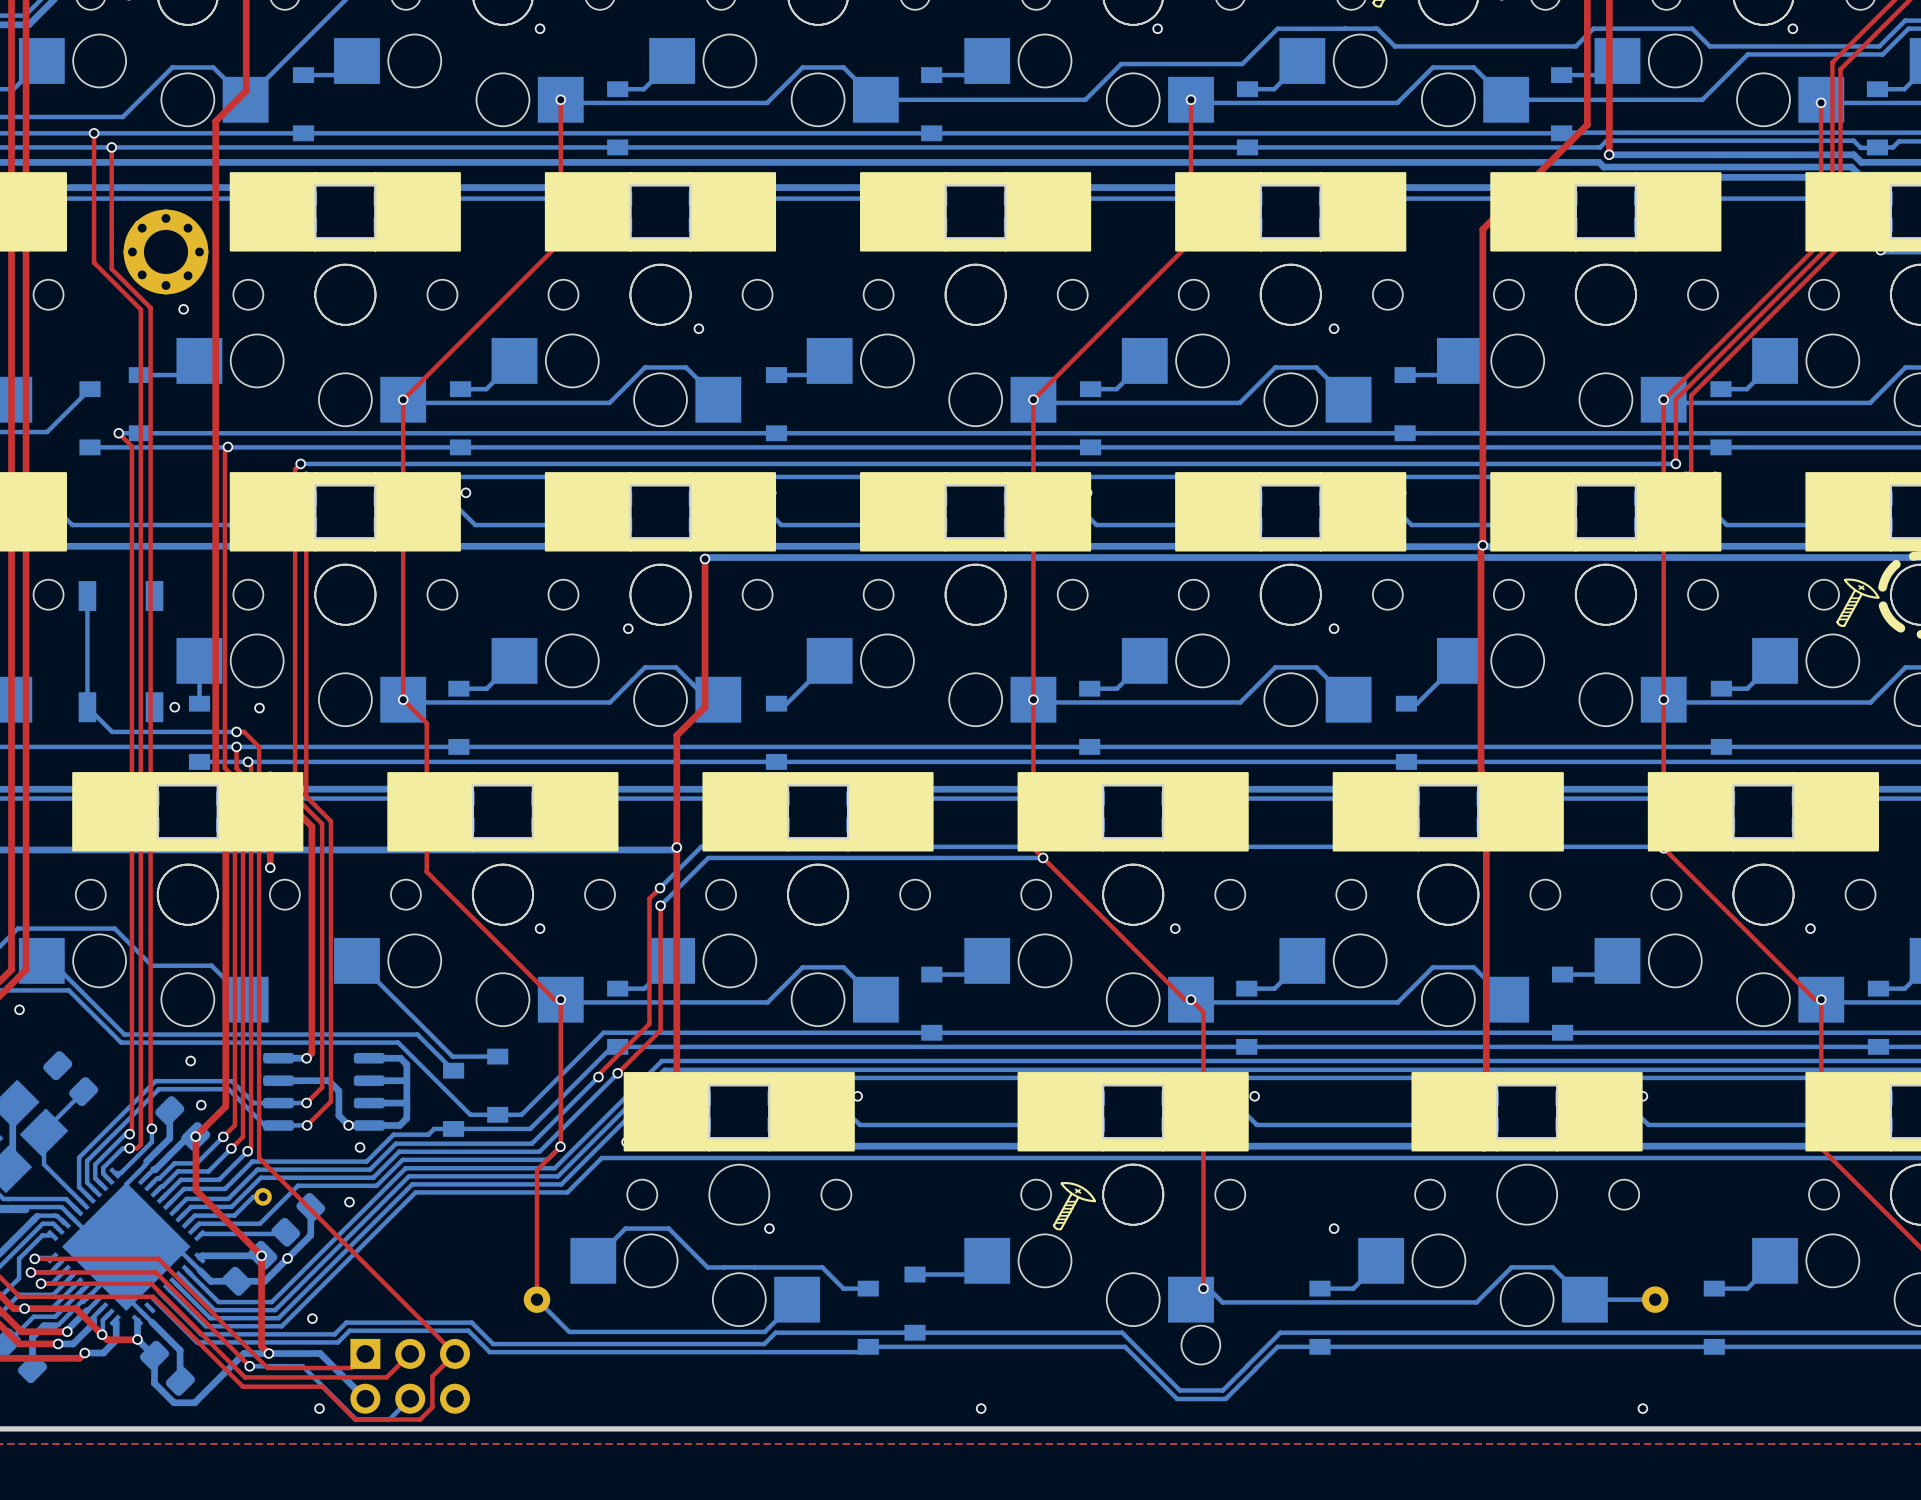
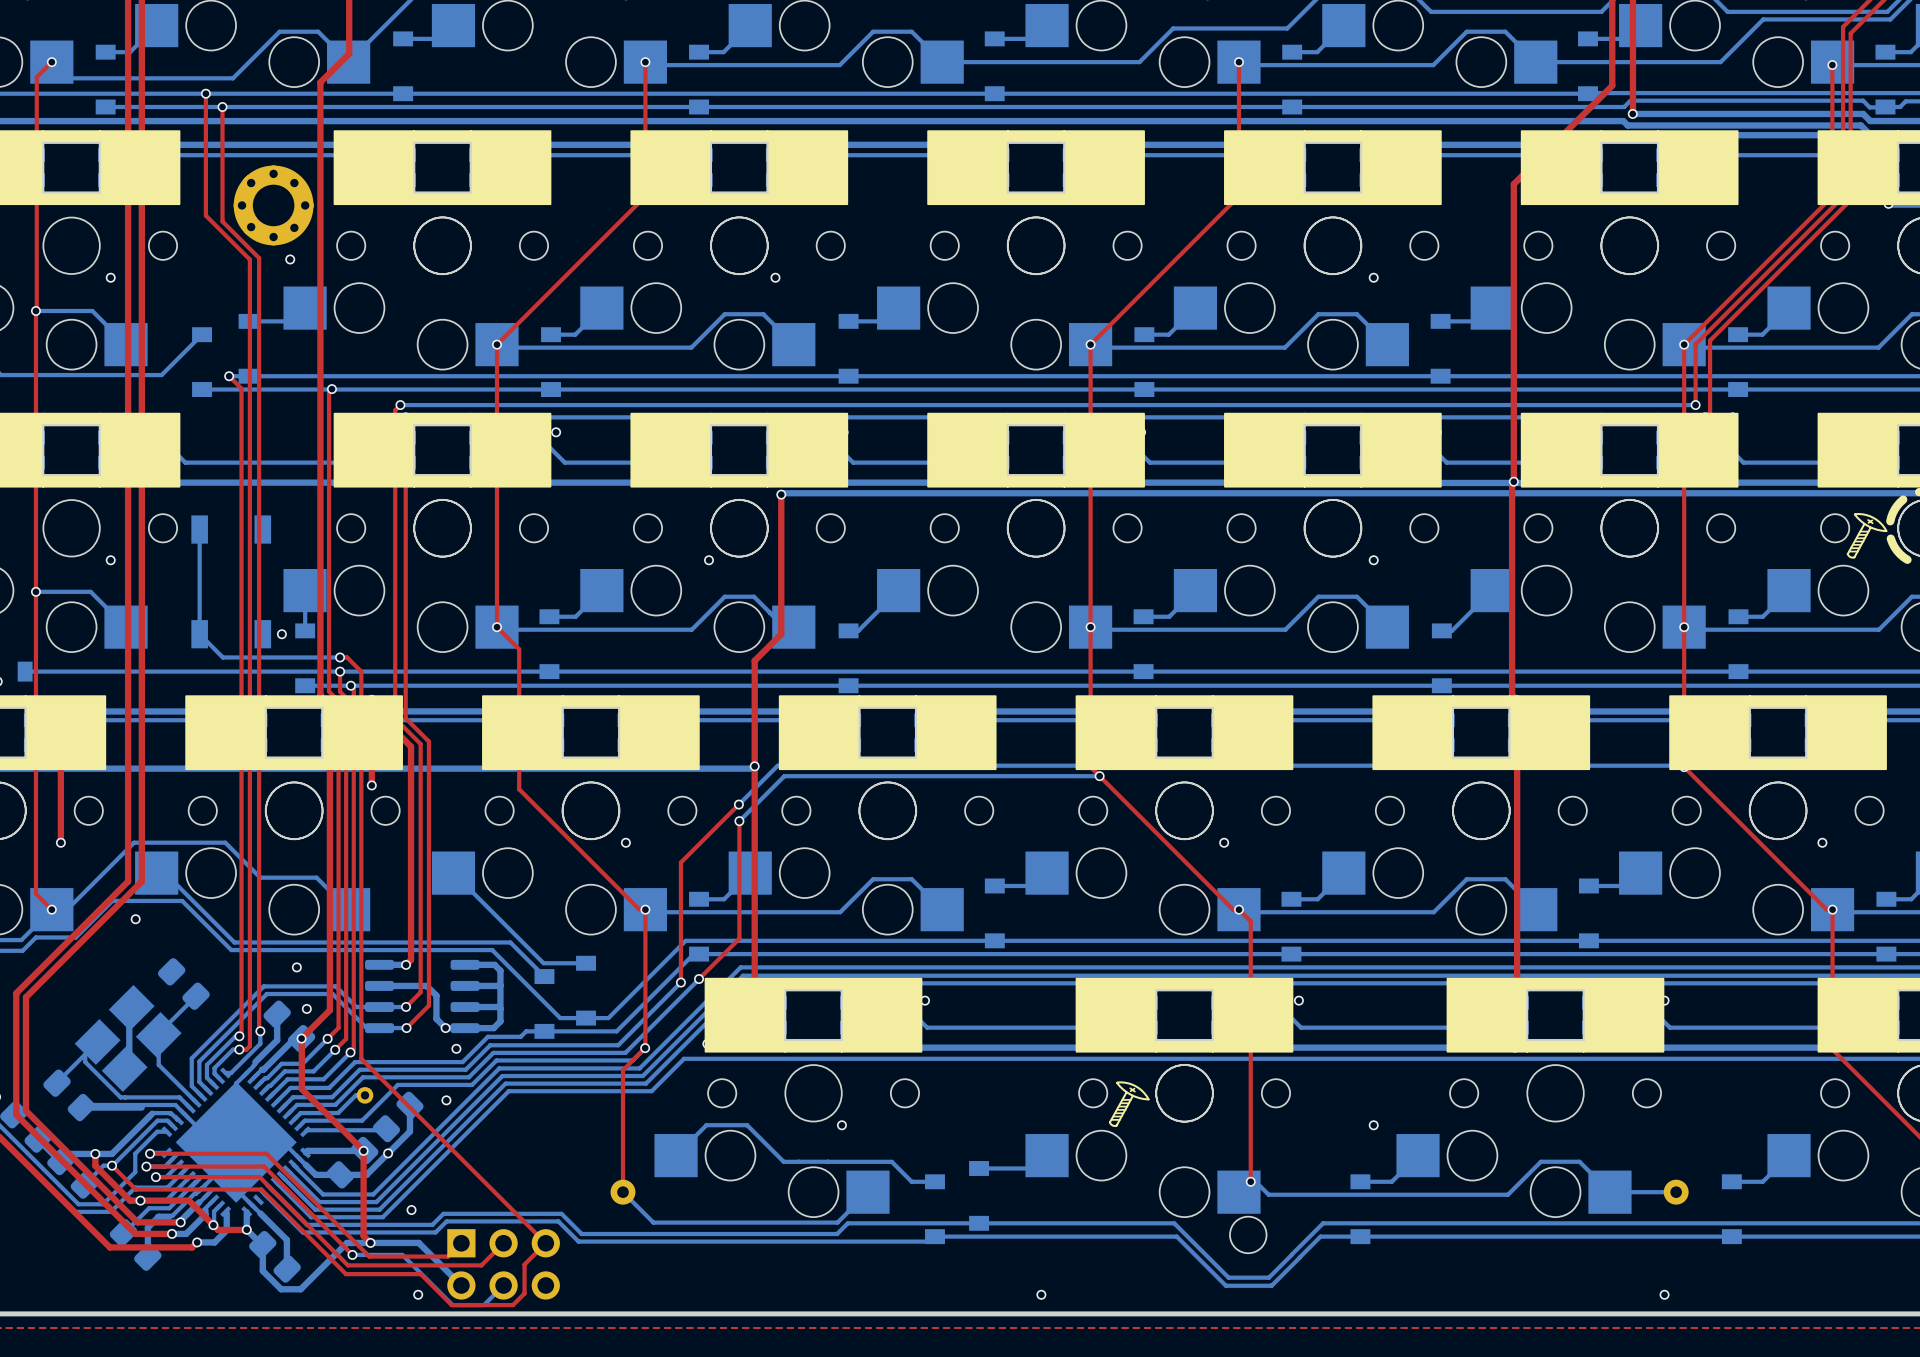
via: (259, 708) -> none
top track: (649, 898) (649, 1023) (598, 1074) -> (728, 814) (680, 862) (680, 980)

